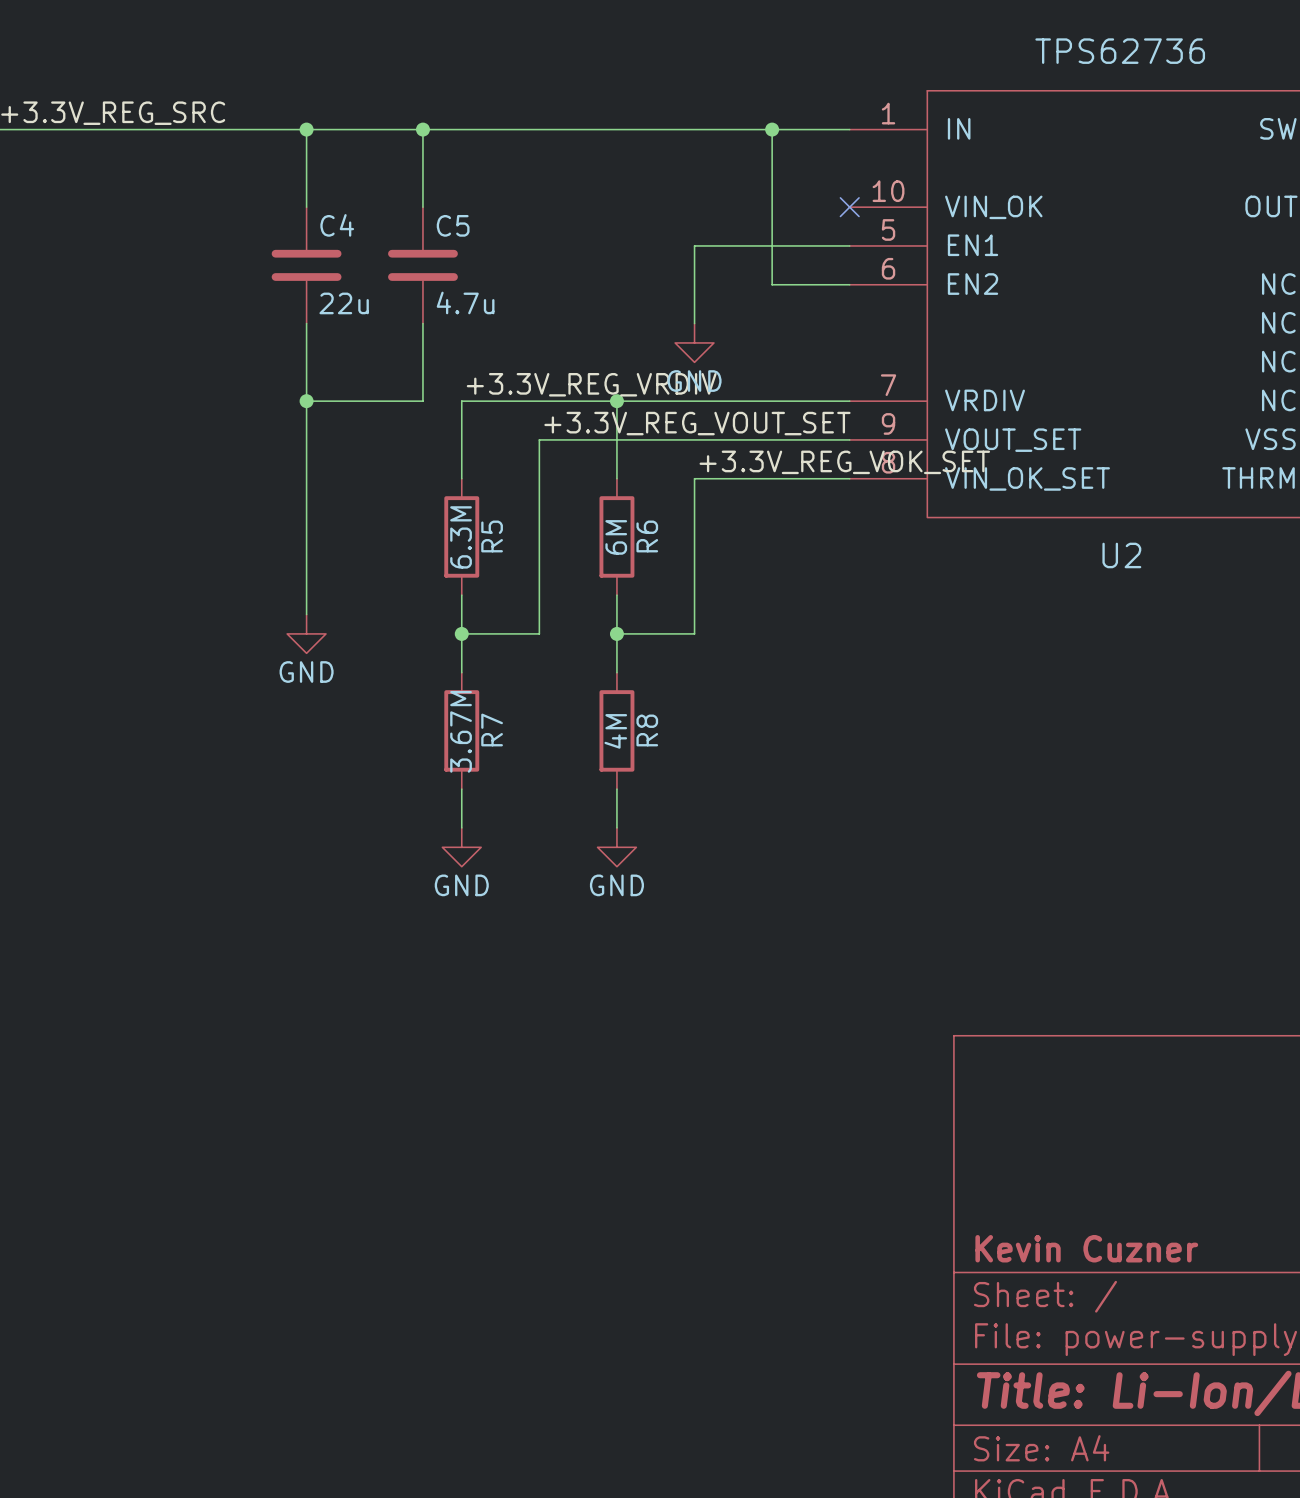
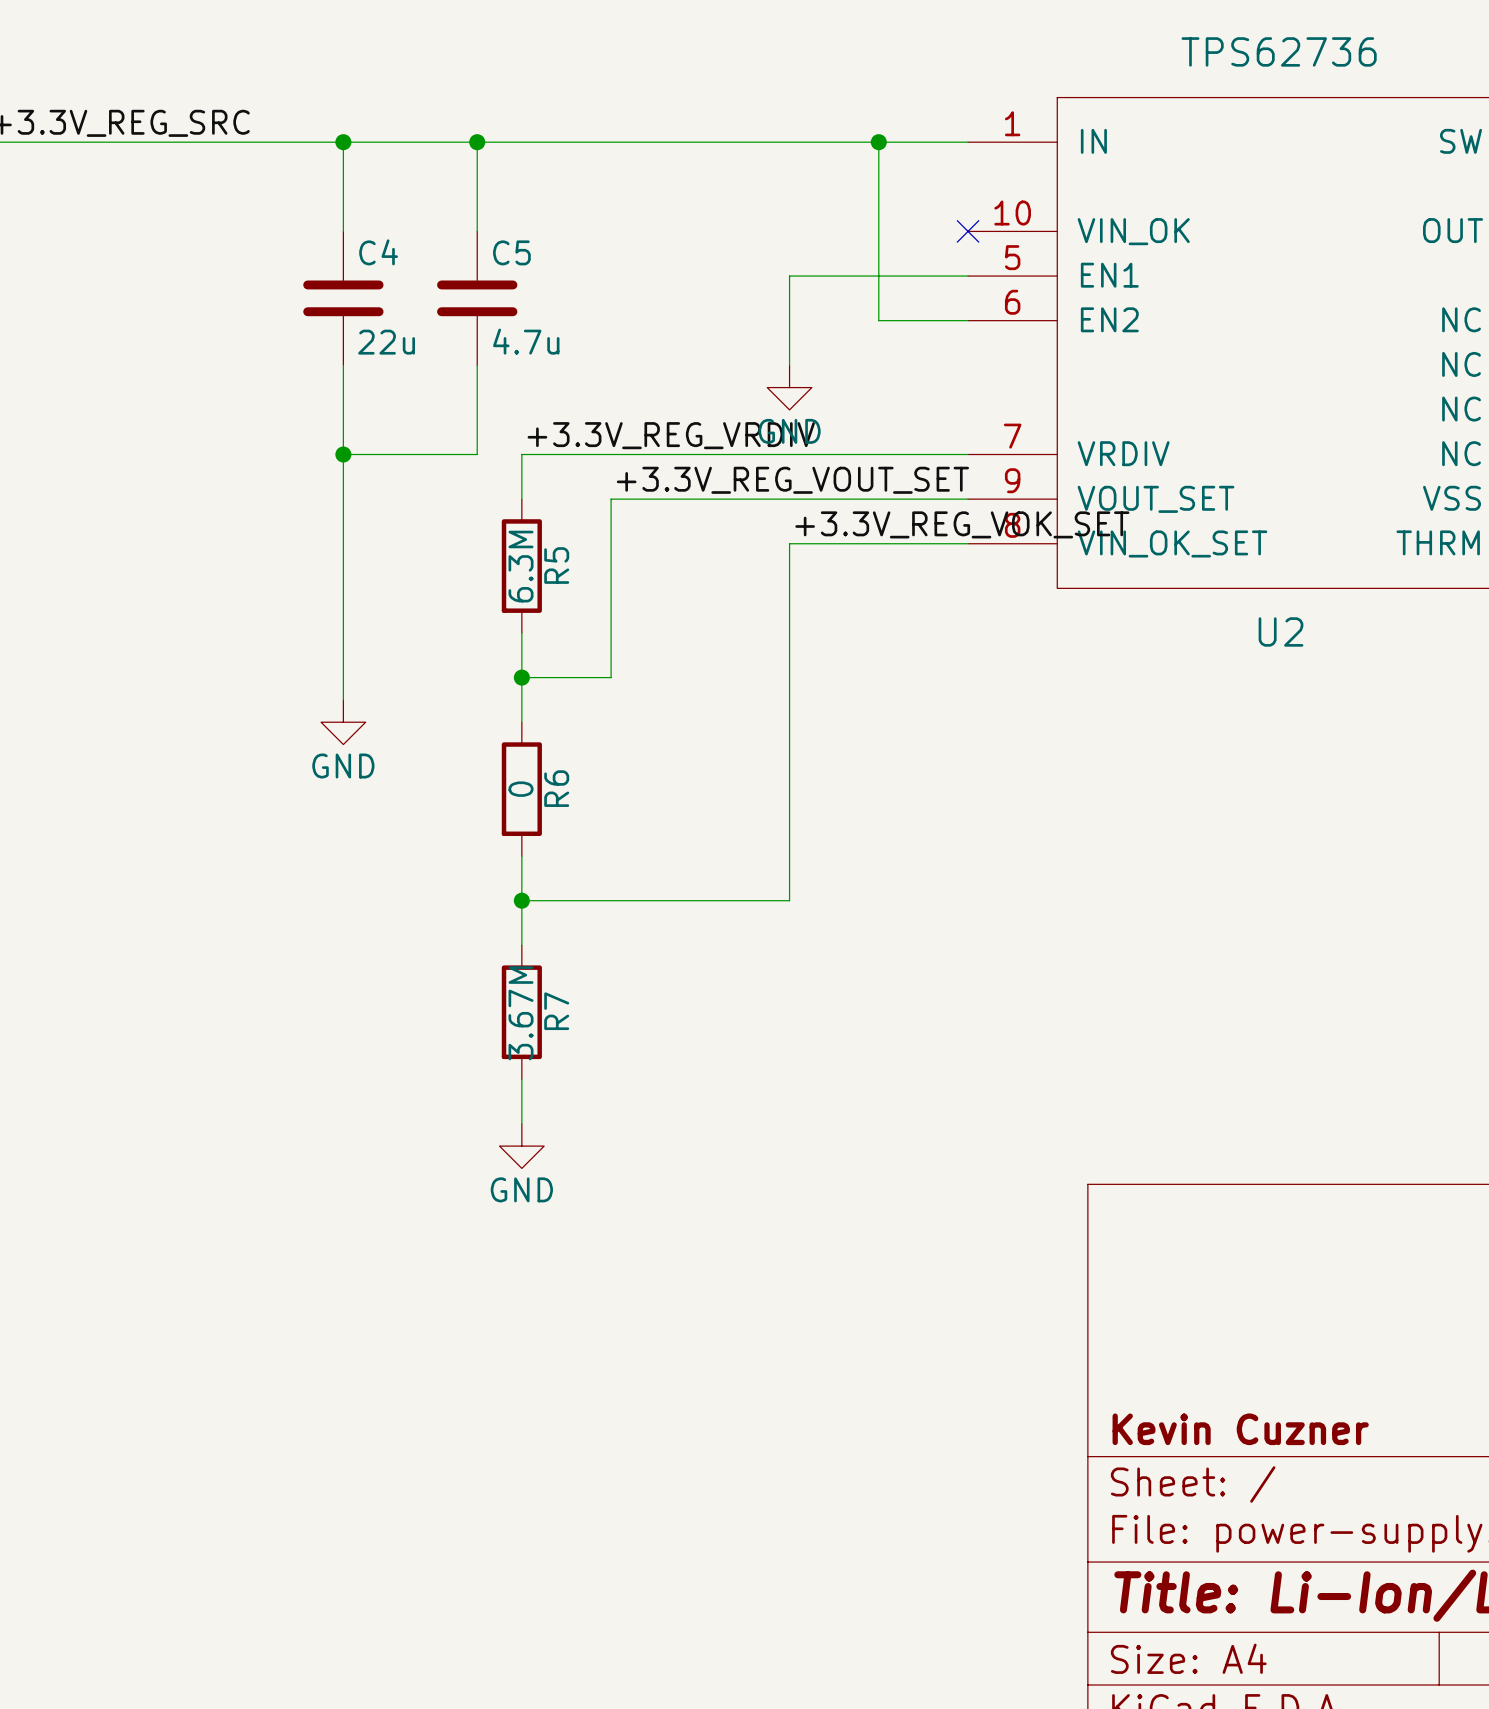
wire: (616, 401) (616, 478) -> none
junction: (616, 401) -> none
R5 position: (461, 536) -> (521, 566)
R6 position: (616, 536) -> (521, 789)
R6 value: 6M (616, 537) -> 0 (521, 789)
wire: (539, 595) (539, 633) (461, 633) (461, 672) -> (611, 677) (521, 677) (521, 632)
wire: (616, 595) (616, 672) -> none
junction position: (461, 633) -> (521, 677)
wire: (616, 633) (694, 633) -> (521, 856) (521, 900) (789, 900) (789, 722)
junction: (616, 633) -> none
R7 position: (461, 730) -> (521, 1012)
R8: 4M (616, 730) -> none
junction: none -> (521, 900)
wire: (616, 789) (616, 827) -> (521, 1079) (521, 1123)
power symbol: GND (461, 847) -> none
power symbol: GND (616, 847) -> none
power symbol: none -> GND (521, 1146)

